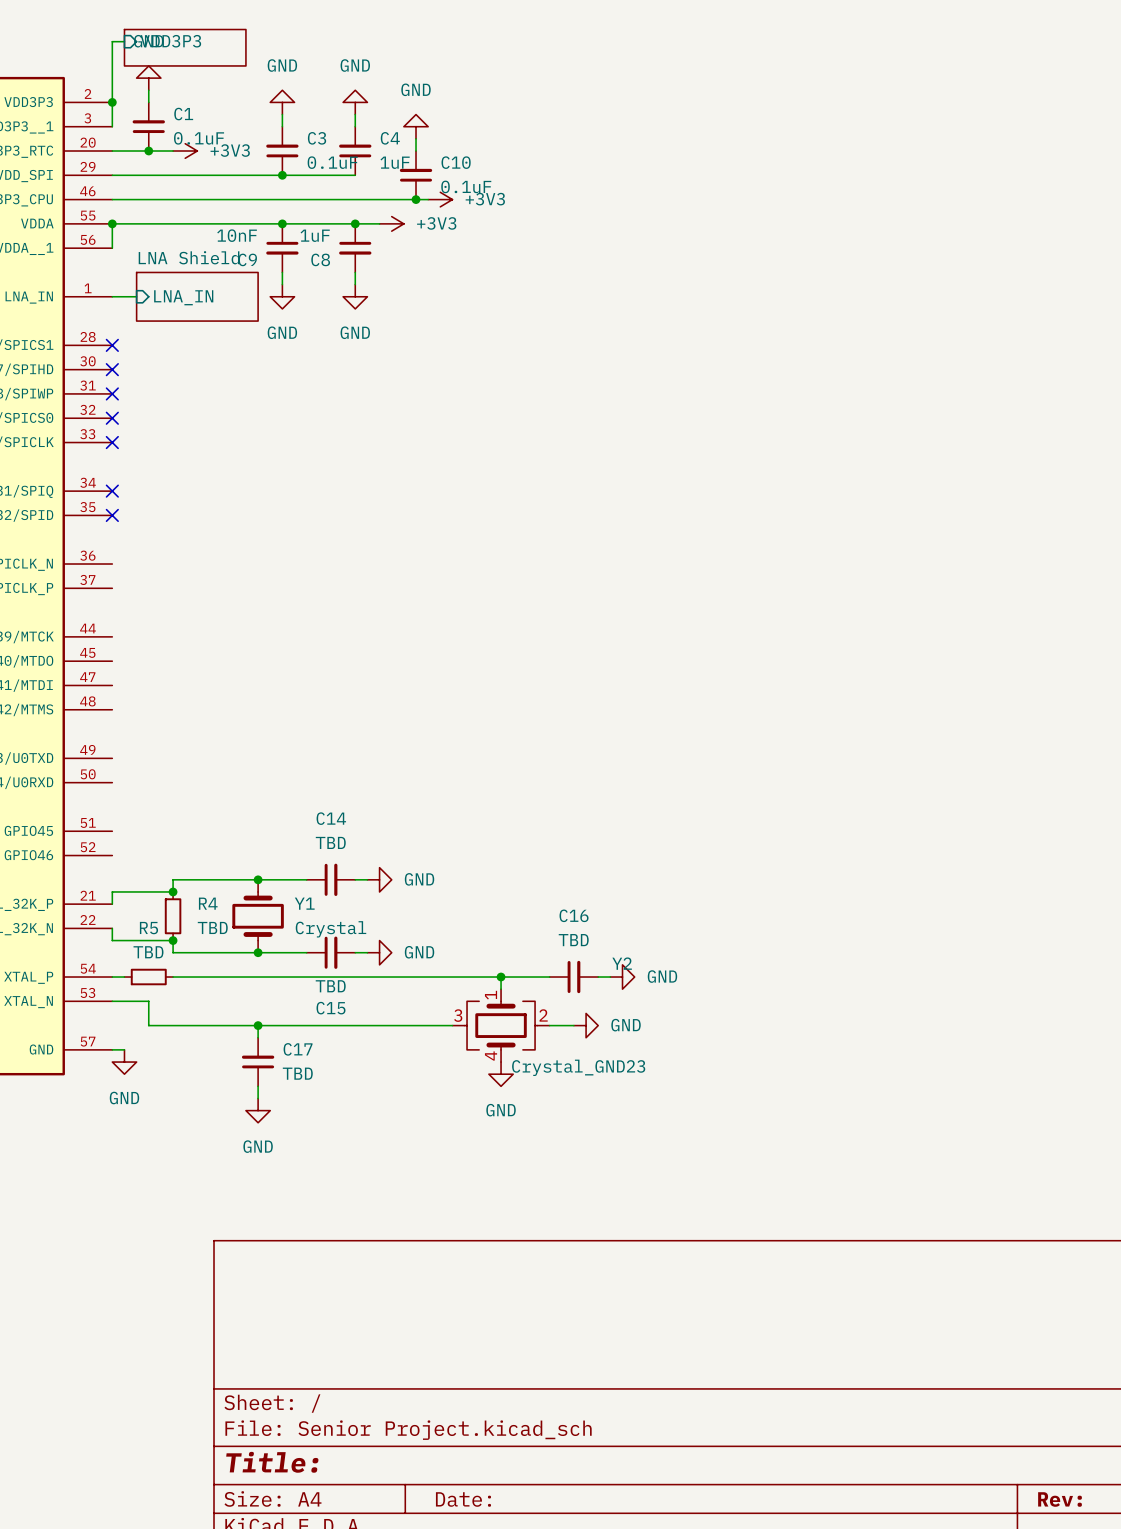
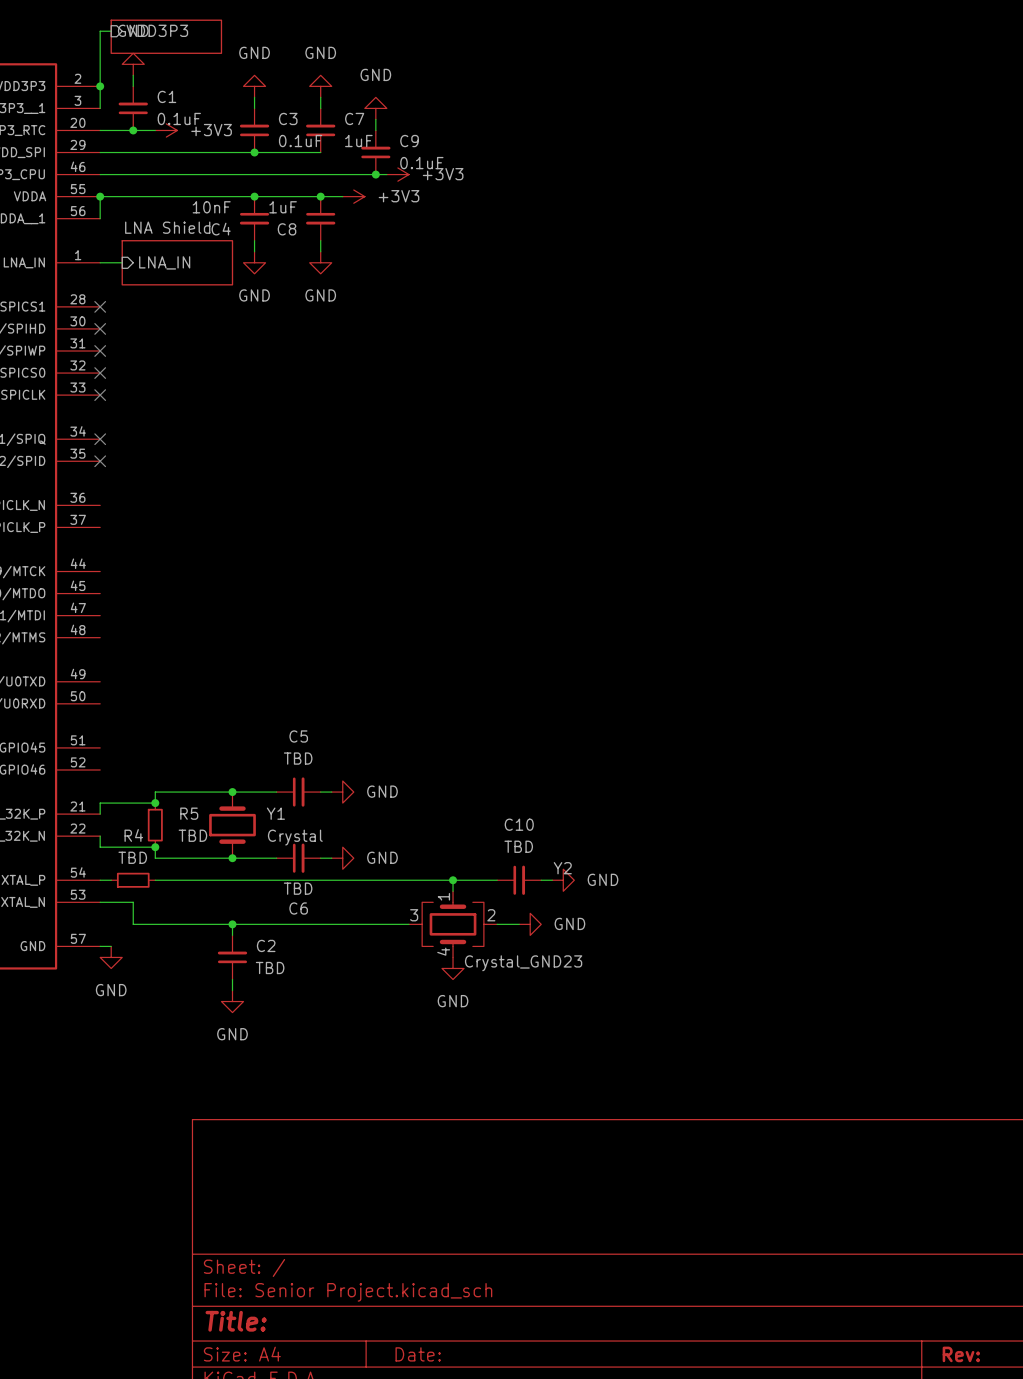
C4 name: C4 (390, 138) -> C7 (354, 118)
C10 name: C10 (456, 162) -> C9 (409, 141)
C9 name: C9 (247, 259) -> C4 (221, 229)
C14 name: C14 (331, 818) -> C5 (298, 736)
R4 name: R4 (208, 903) -> R5 (189, 813)
C16 name: C16 (574, 915) -> C10 (519, 824)
R5 name: R5 (148, 928) -> R4 (133, 835)
C15 name: C15 (331, 1008) -> C6 (298, 908)
C17 name: C17 (298, 1049) -> C2 (266, 945)

